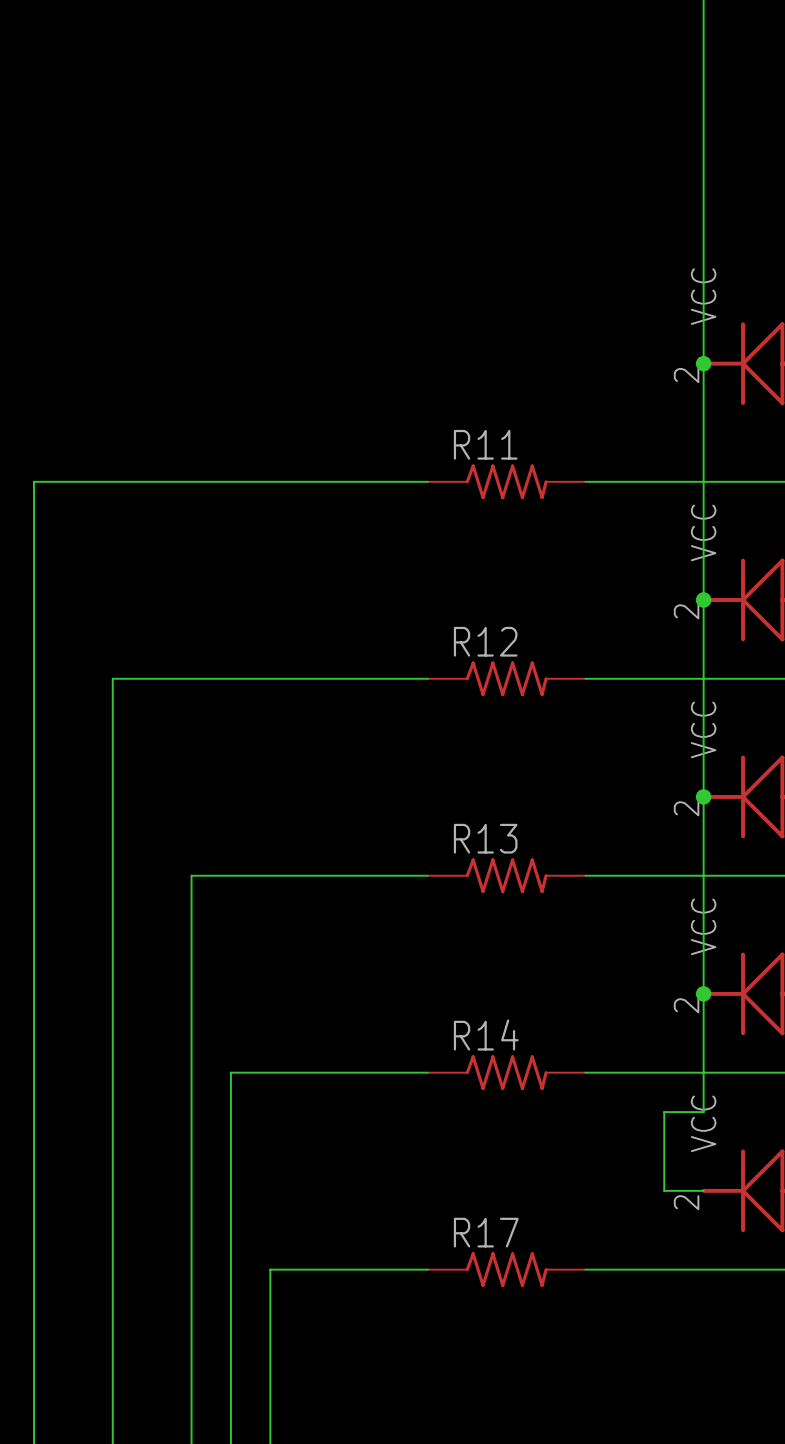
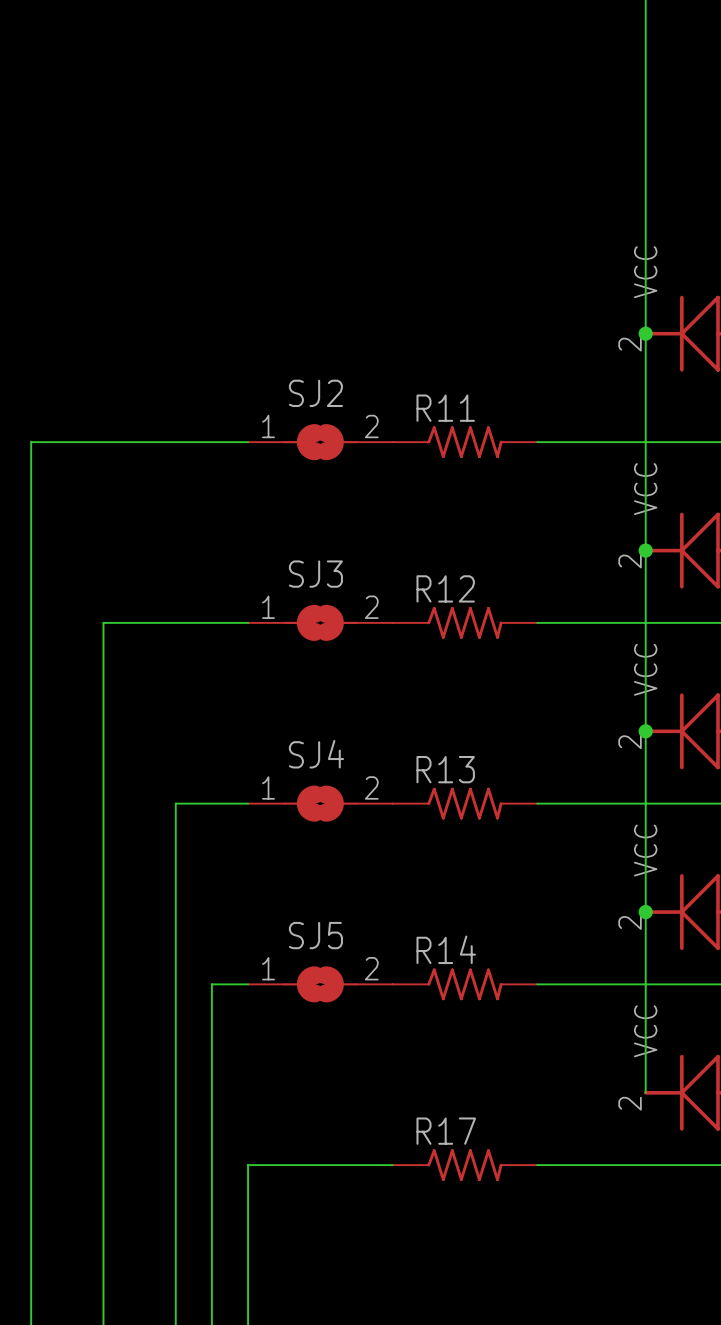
SJ2: none -> (320, 442)
SJ3: none -> (320, 622)
SJ4: none -> (320, 803)
SJ5: none -> (320, 984)
wire: (703, 1112) (664, 1112) (664, 1190) (703, 1190) -> (645, 1020) (645, 1092)

